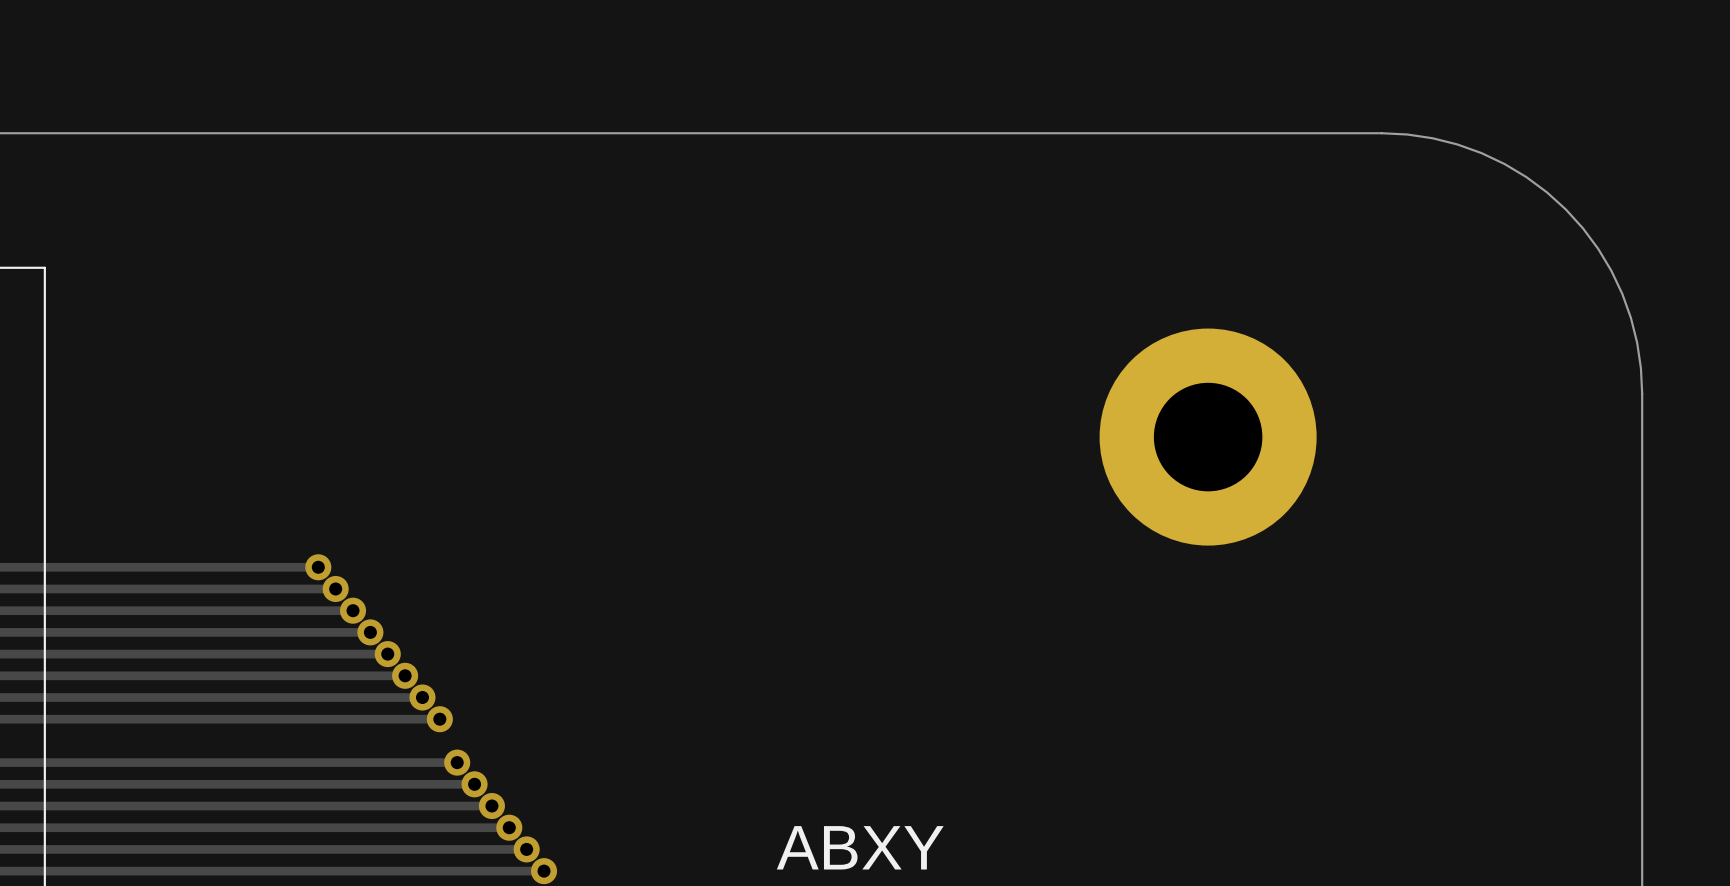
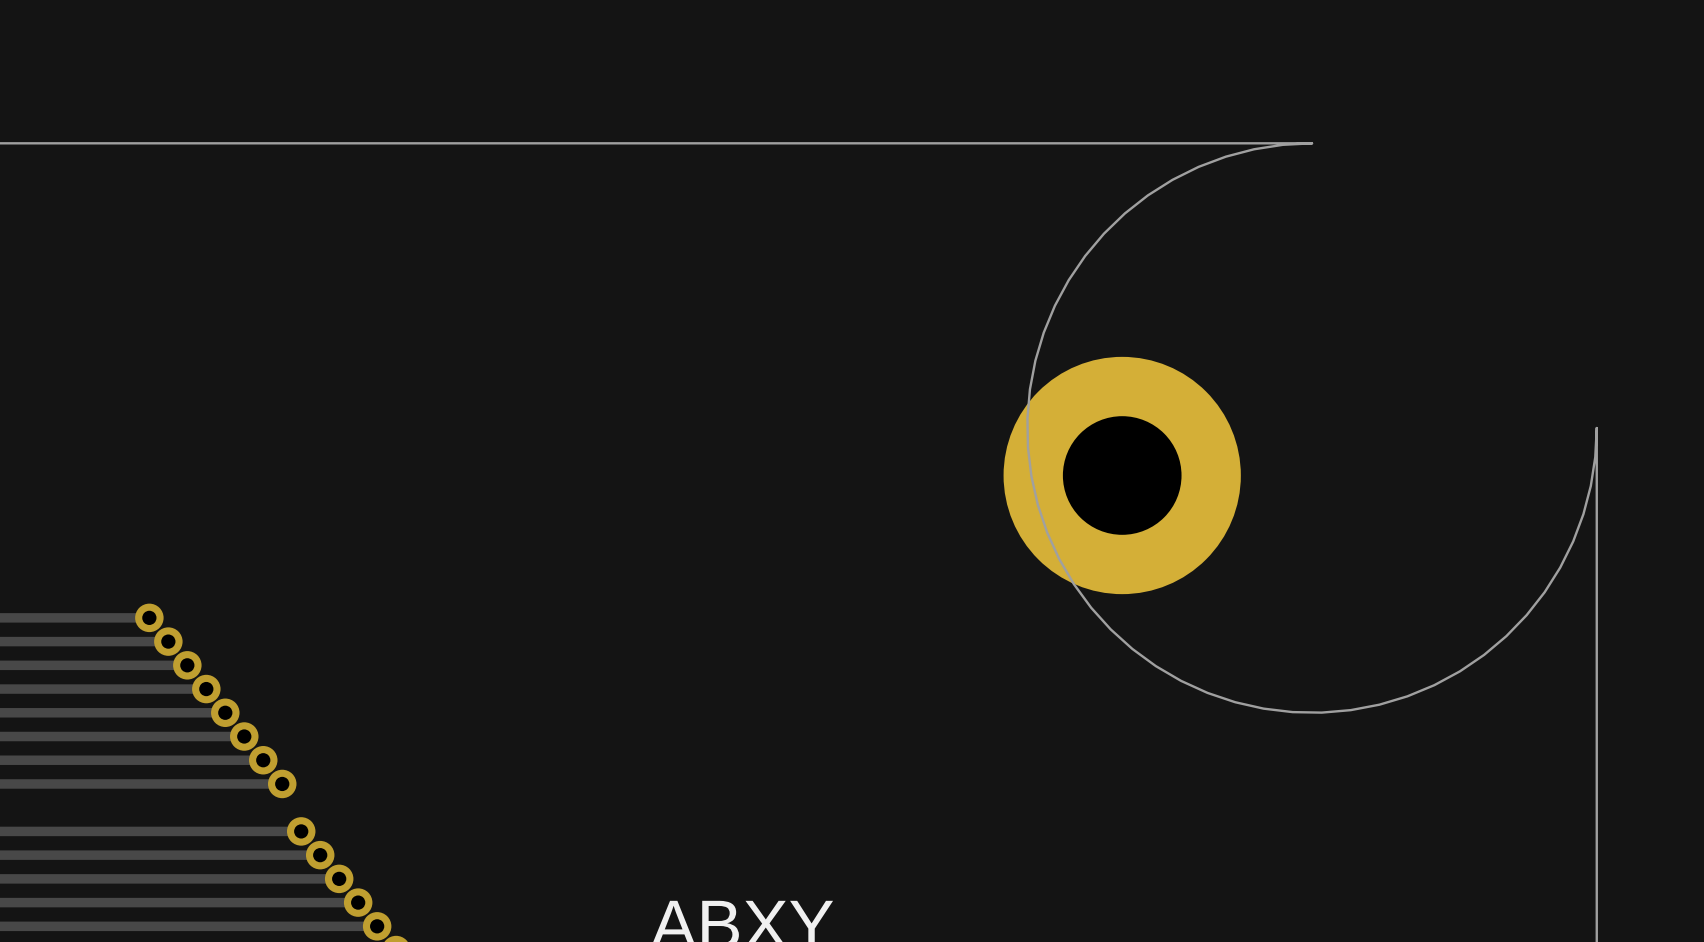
board edge: (1381, 133) (1432, 138) (1481, 153) (1526, 177) (1565, 209) (1598, 248) (1622, 294) (1637, 342) (1642, 393) -> (1312, 143) (1254, 149) (1225, 156) (1172, 179) (1147, 195) (1103, 233) (1085, 255) (1054, 305) (1043, 332) (1029, 389) (1027, 418) (1031, 476) (1037, 504) (1059, 559) (1073, 584) (1110, 629) (1155, 666) (1181, 680) (1207, 692) (1263, 708) (1321, 712) (1350, 710) (1379, 704) (1434, 685) (1459, 671) (1506, 636) (1544, 592) (1573, 541) (1583, 514) (1590, 485) (1596, 428)

